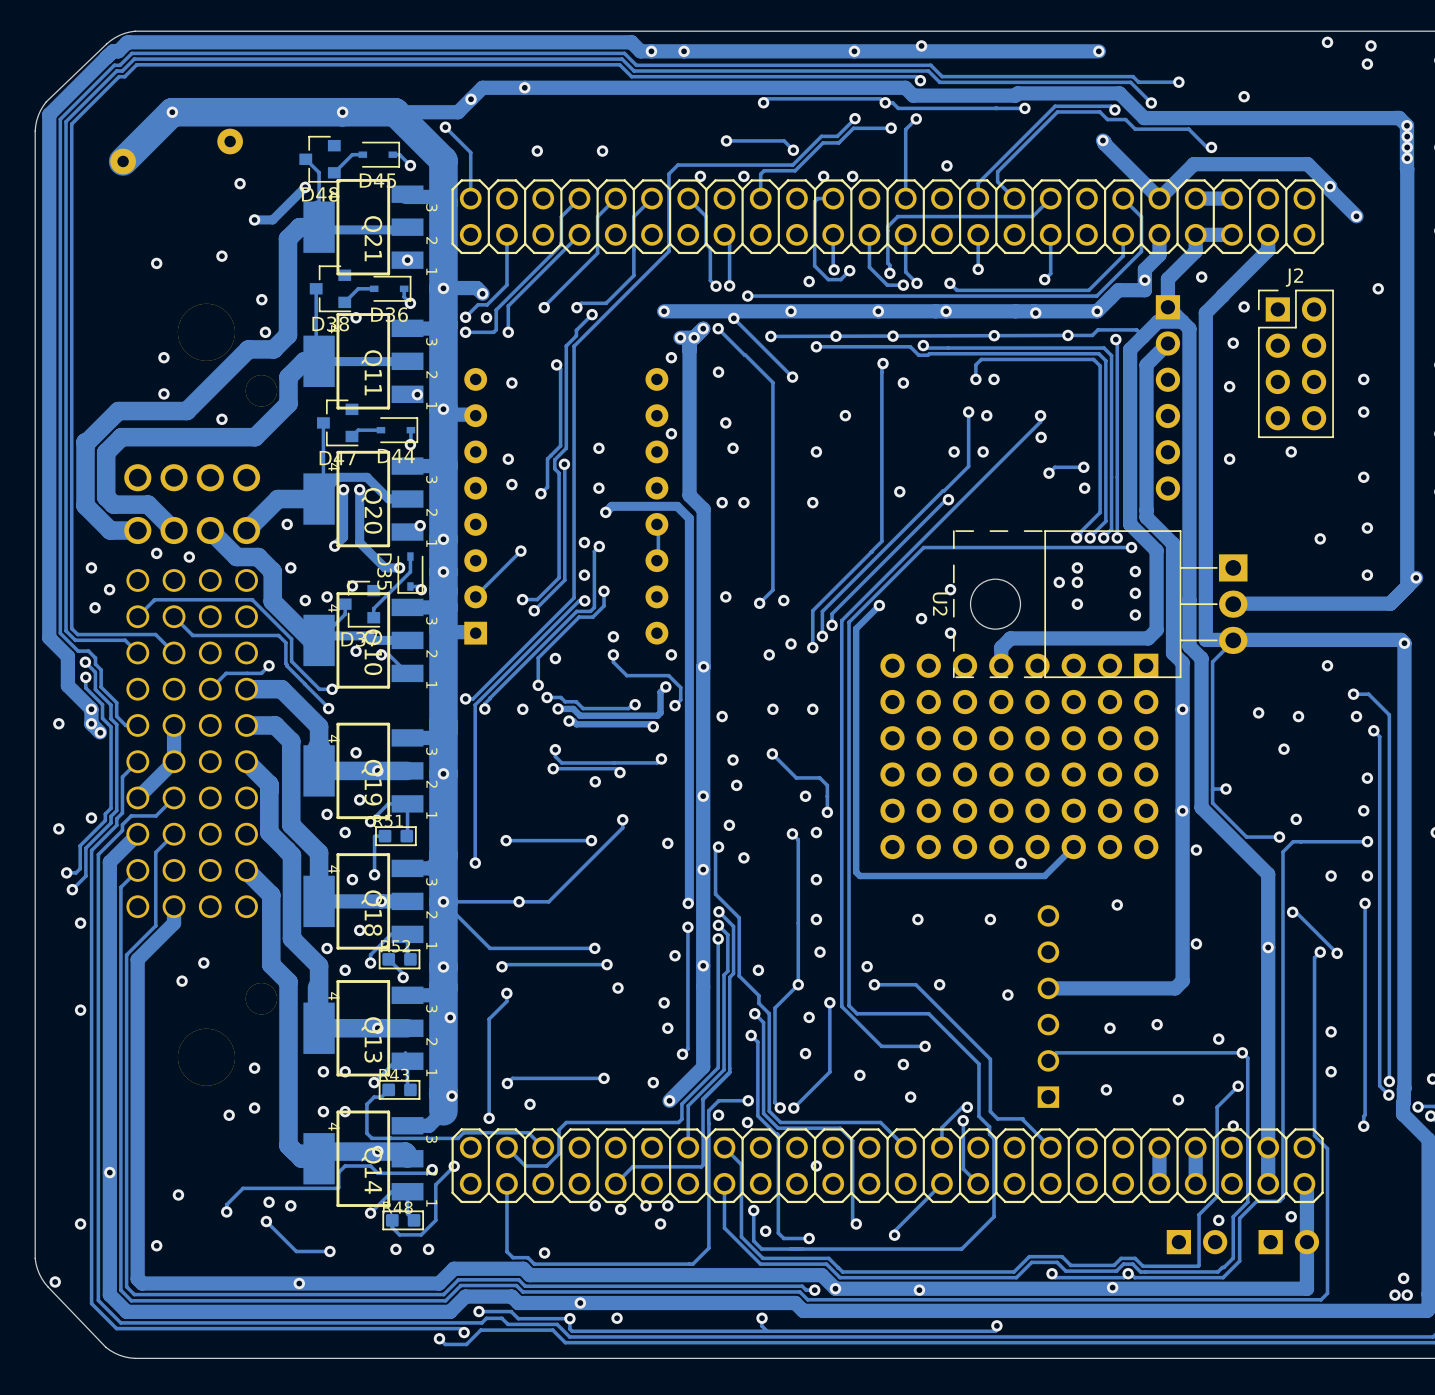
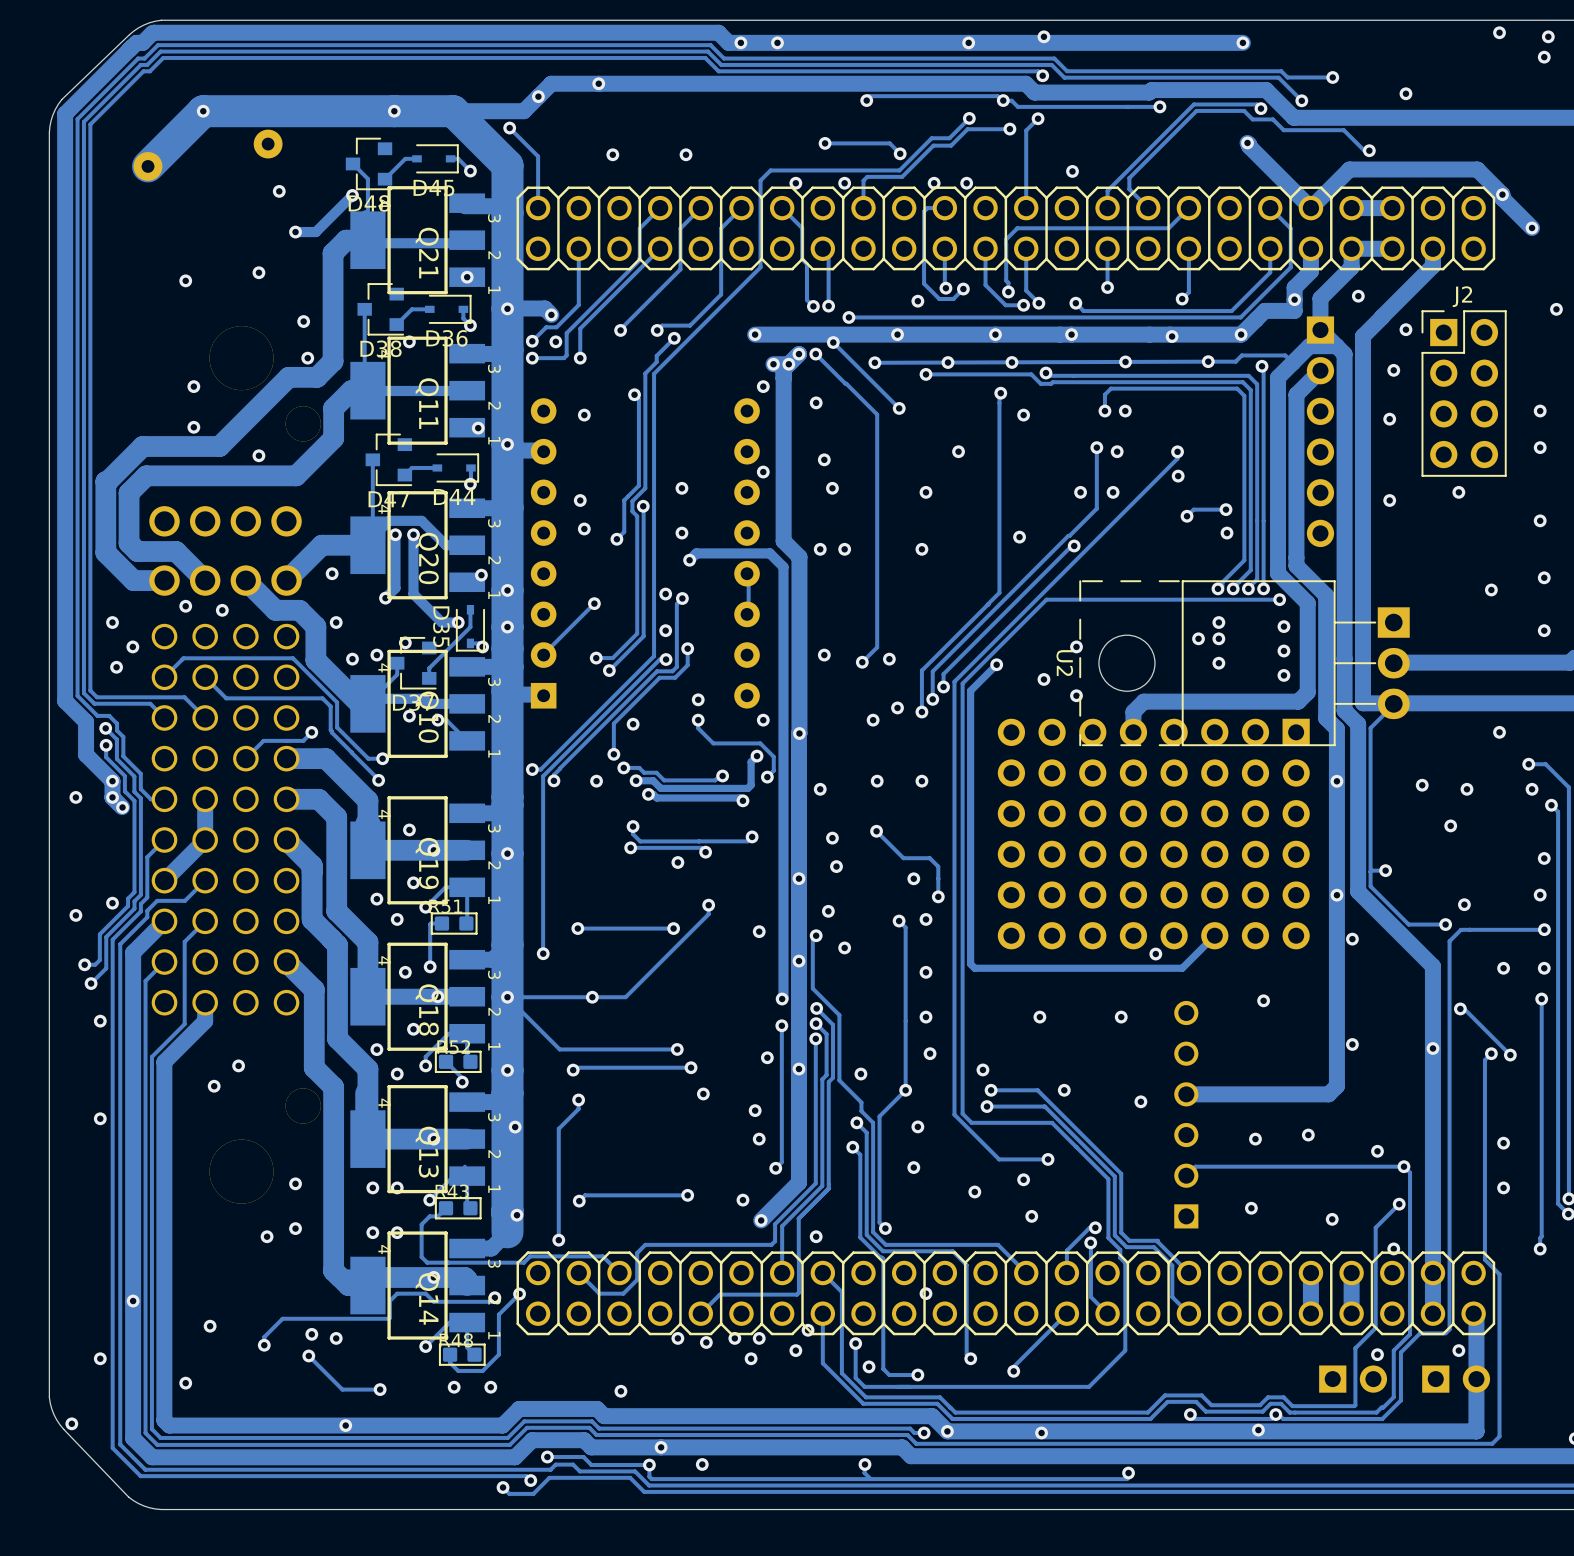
track: none -> (987, 1106) (1044, 1106) (1114, 1176) (1114, 1235) (1126, 1247) (1154, 1247) (1172, 1265) (1172, 1297) (1188, 1313)
track: (829, 1002) (829, 1072) (793, 1108) -> none
via position: (829, 1002) -> (987, 1106)
track: (748, 1100) (718, 1100) (708, 1110) (708, 1123) -> none
via: (748, 1100) -> none
via: (530, 1104) -> none
via: (793, 1108) -> none
via: (747, 1122) -> none
track: (708, 1123) (708, 1248) (692, 1264) (534, 1264) (527, 1257) (513, 1257) (506, 1251) (506, 1183) -> none
via: none -> (808, 1330)
via: none -> (795, 1350)

